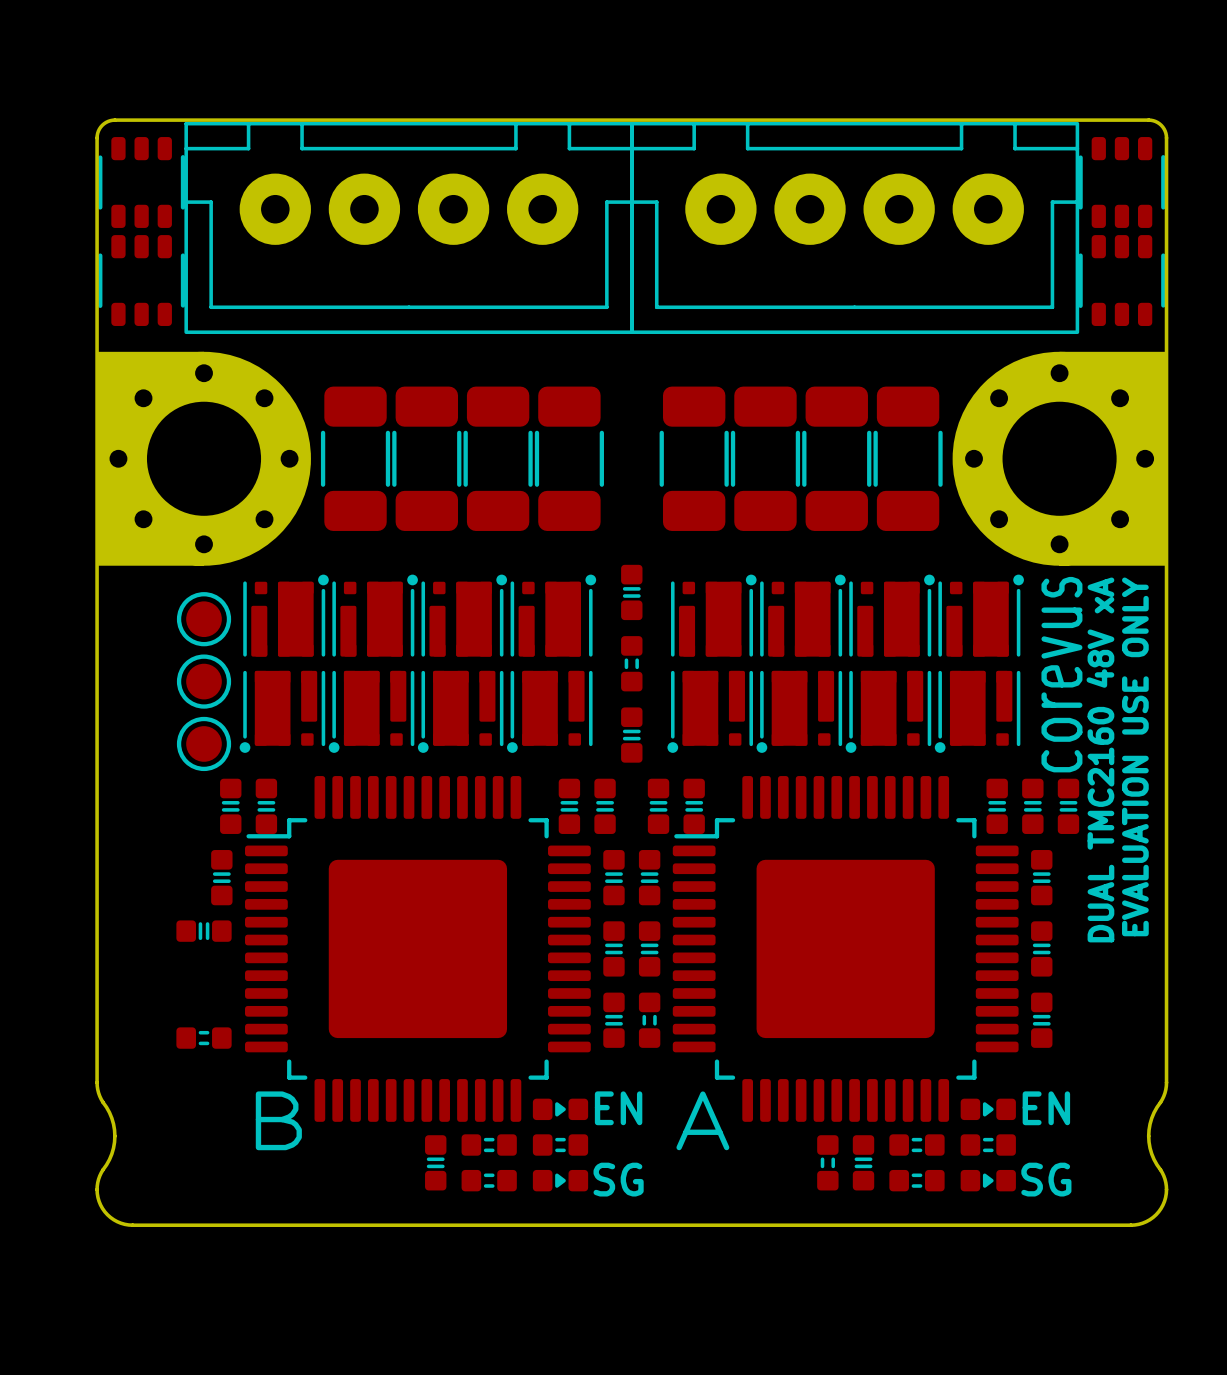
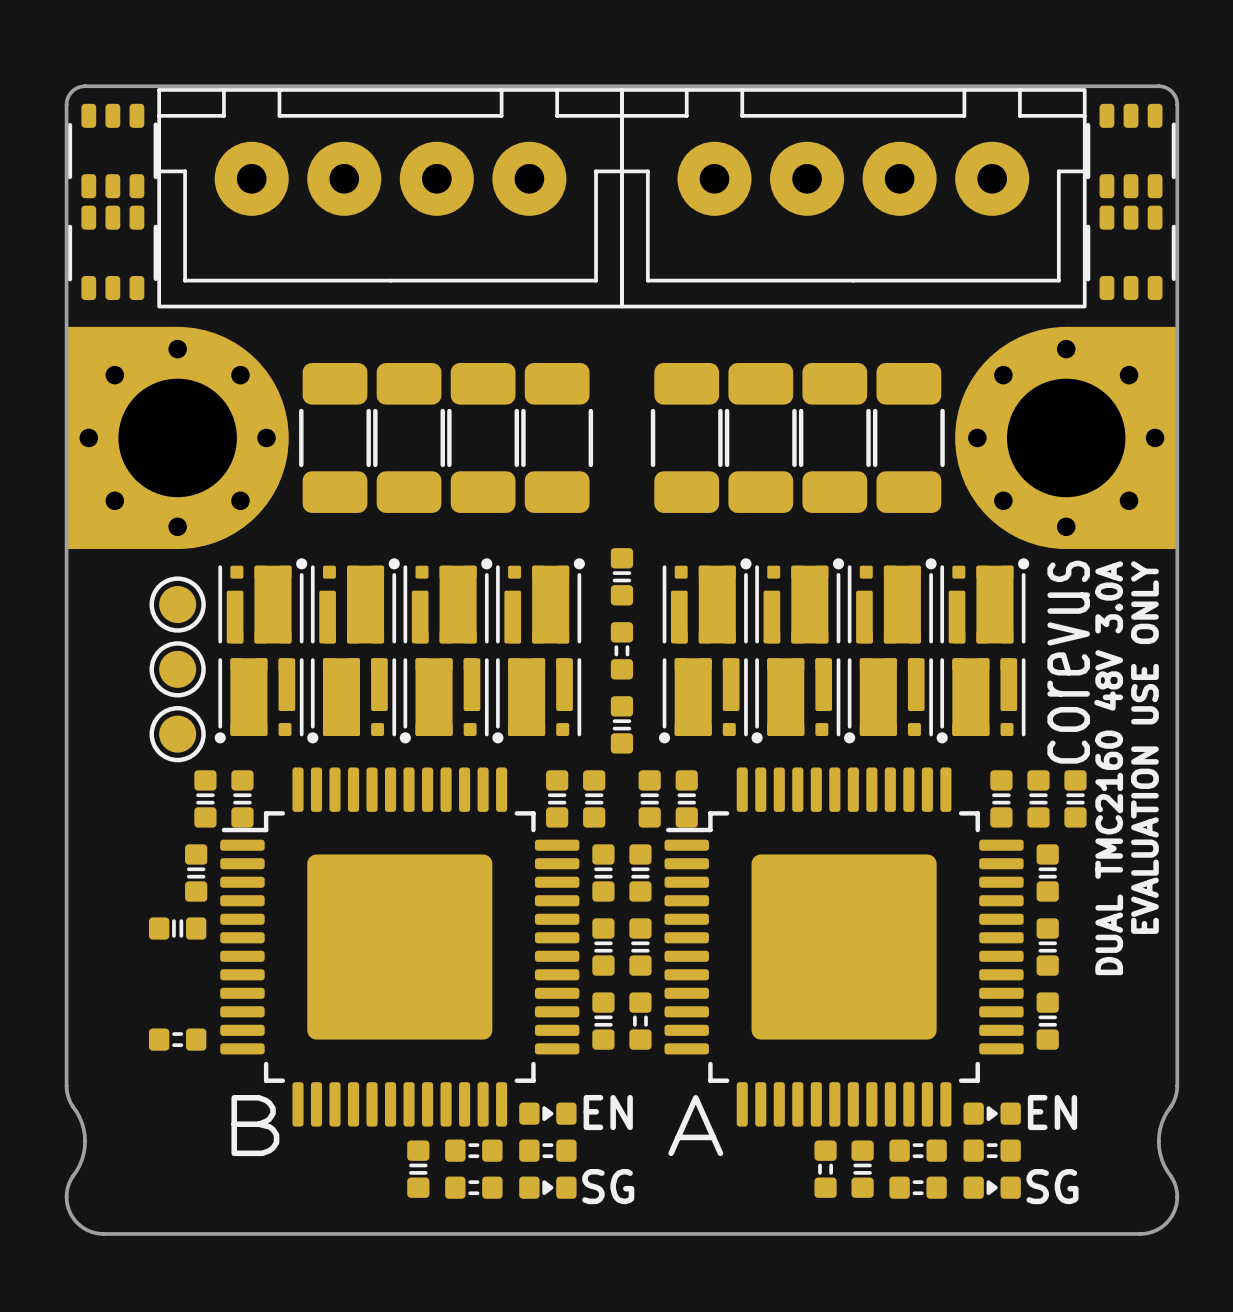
text: DUAL TMC2160 48V xA (1100, 759) -> DUAL TMC2160 48V 3.0A (1108, 768)

